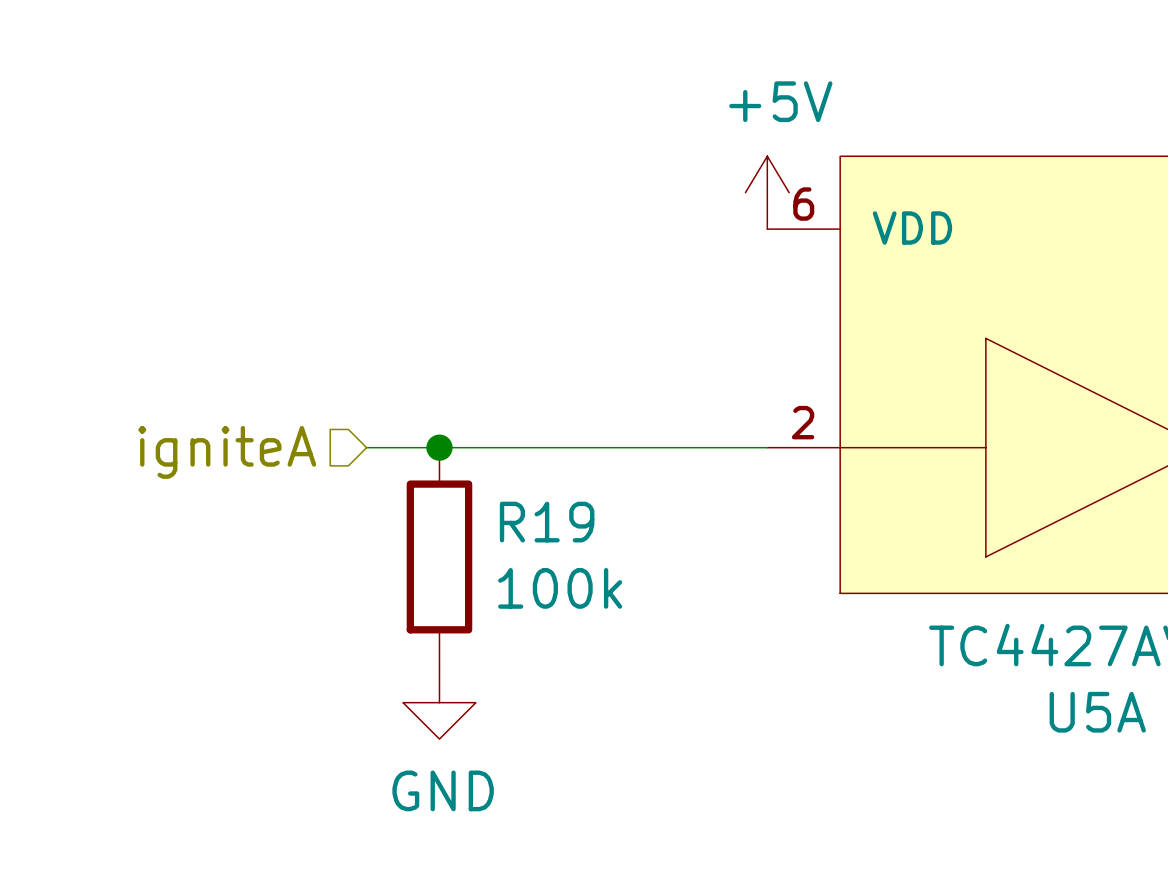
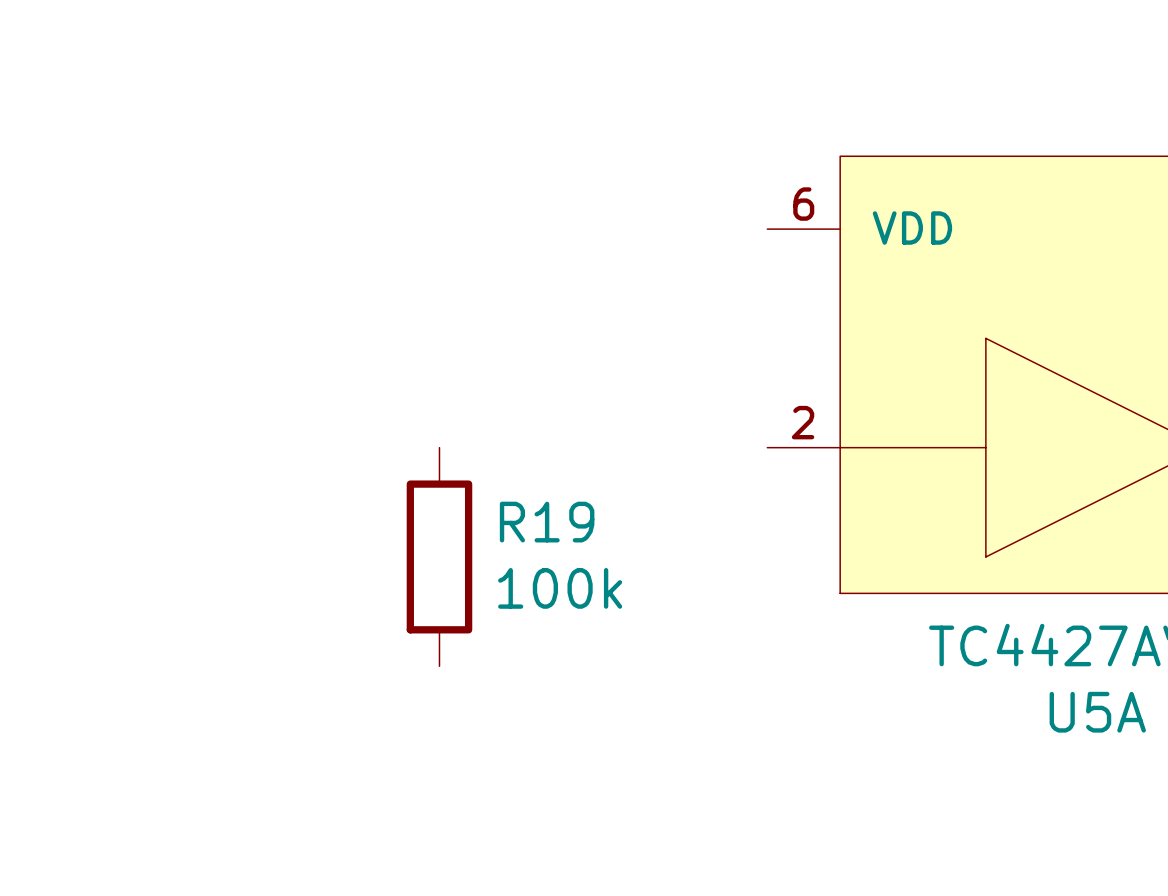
power symbol: +5V (767, 192) -> none
wire: (366, 447) (767, 447) -> none
junction: (439, 447) -> none
hierarchical label: igniteA (227, 452) -> none
power symbol: GND (439, 702) -> none

